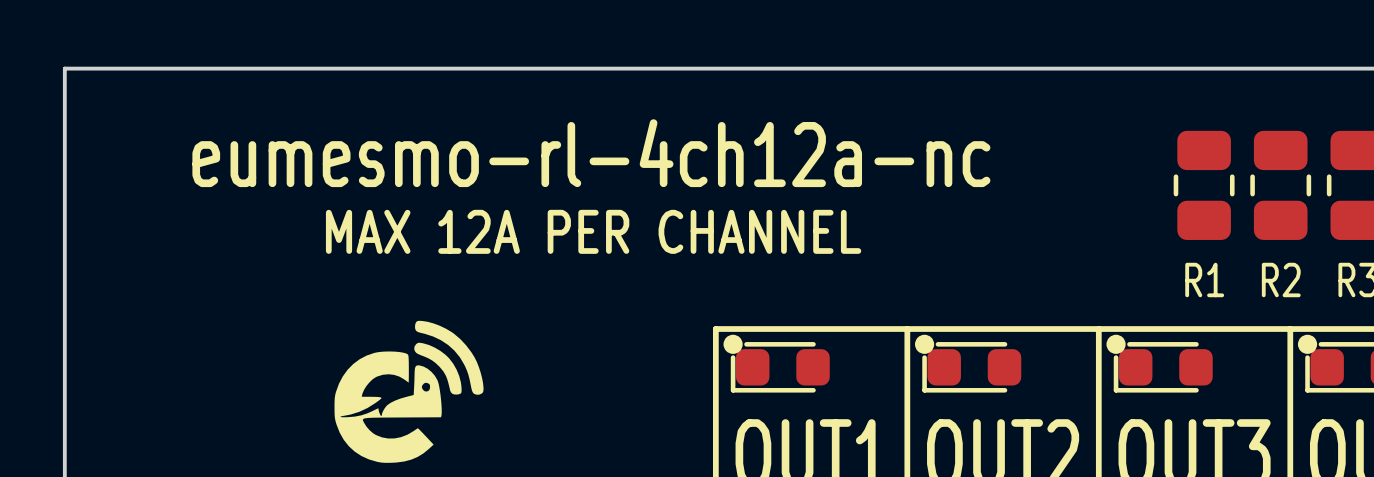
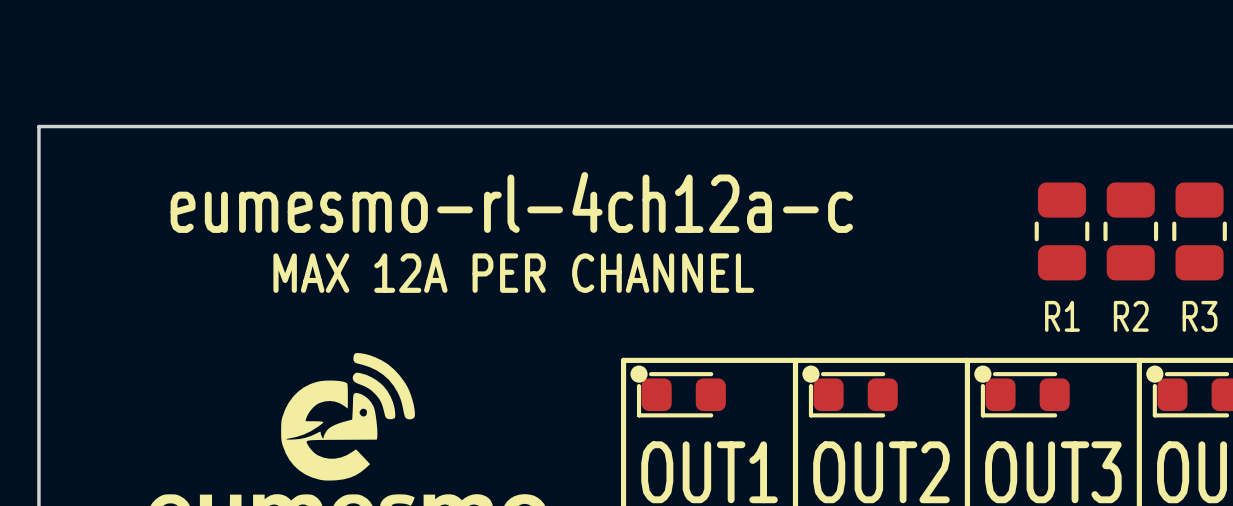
text: eumesmo-rl-4ch12a-nc (591, 153) -> eumesmo-rl-4ch12a-c (511, 202)

